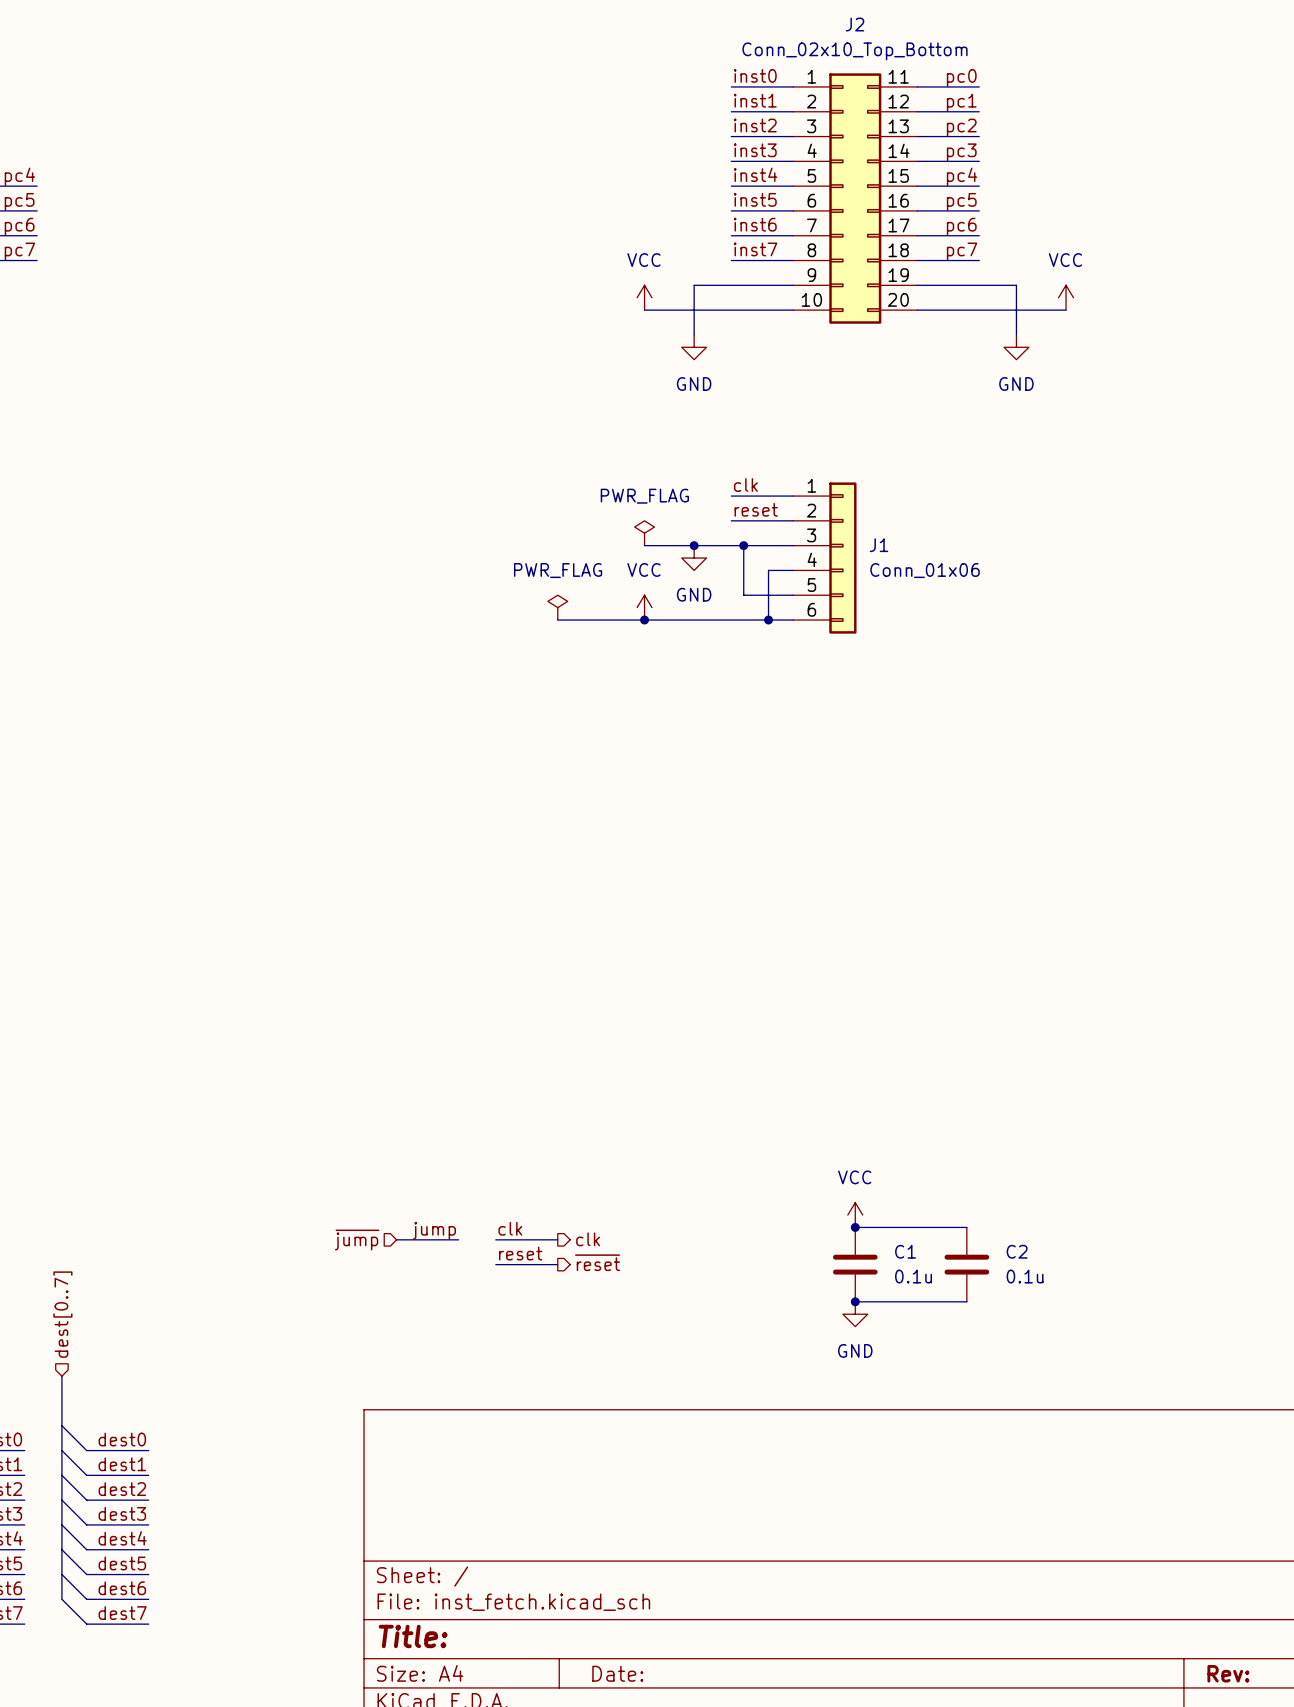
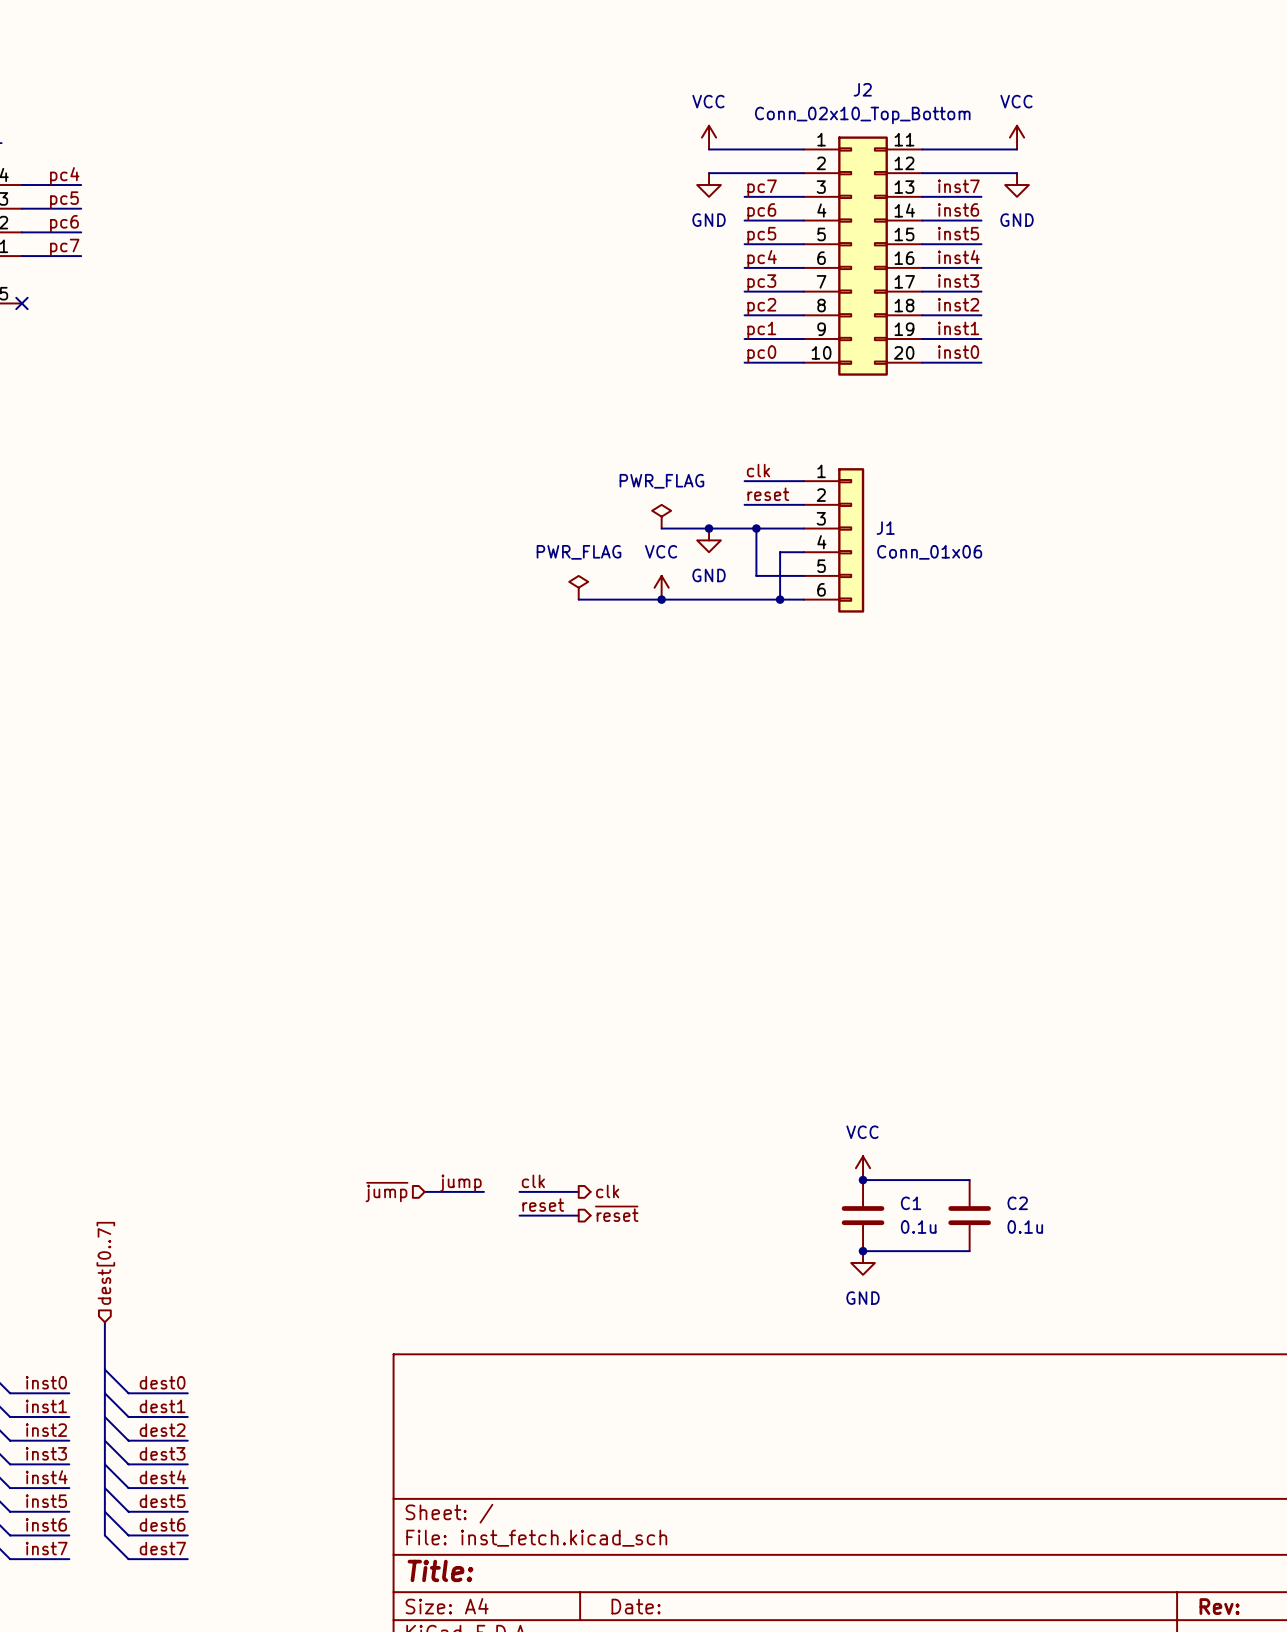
label: inst0 (755, 75) -> none
label: pc0 (961, 77) -> none
wire: (731, 86) (793, 86) -> (744, 196) (803, 196)
wire: (917, 86) (979, 86) -> (922, 196) (981, 196)
label: inst1 (755, 100) -> none
label: pc1 (961, 102) -> none
wire: (731, 111) (793, 111) -> (744, 220) (803, 220)
wire: (917, 111) (979, 111) -> (922, 220) (981, 220)
label: inst2 (755, 125) -> none
label: pc2 (961, 127) -> none
wire: (731, 136) (793, 136) -> (744, 244) (803, 244)
wire: (917, 136) (979, 136) -> (922, 244) (981, 244)
wire: none -> (709, 149) (803, 149)
wire: none -> (922, 149) (1017, 149)
label: inst3 (755, 150) -> none
label: pc3 (961, 152) -> none
wire: (731, 161) (793, 161) -> (744, 267) (803, 267)
wire: (917, 161) (979, 161) -> (922, 267) (981, 267)
wire: none -> (709, 173) (803, 173)
wire: none -> (922, 173) (1017, 173)
label: inst4 (755, 174) -> none
label: pc4 (962, 176) -> none
wire: (731, 186) (793, 186) -> (744, 291) (803, 291)
wire: (917, 186) (979, 186) -> (922, 291) (981, 291)
label: none -> inst7 (958, 186)
label: none -> pc7 (762, 188)
J2 position: (855, 198) -> (863, 256)
label: inst5 (755, 199) -> none
label: pc5 (961, 201) -> none
wire: (731, 210) (793, 210) -> (744, 315) (803, 315)
wire: (917, 210) (979, 210) -> (922, 315) (981, 315)
label: none -> inst6 (958, 209)
label: none -> pc6 (761, 211)
label: inst6 (755, 224) -> none
label: pc6 (961, 226) -> none
wire: (731, 235) (793, 235) -> (744, 339) (803, 339)
wire: (917, 235) (979, 235) -> (922, 339) (981, 339)
label: none -> inst5 (958, 233)
label: none -> pc5 (761, 235)
label: inst7 (755, 249) -> none
label: pc7 (962, 251) -> none
wire: (731, 260) (793, 260) -> (744, 362) (803, 362)
wire: (917, 260) (979, 260) -> (922, 362) (981, 362)
label: none -> inst4 (958, 257)
label: none -> pc4 (762, 259)
wire: (793, 285) (694, 285) (694, 334) -> none
wire: (917, 285) (1016, 285) (1016, 334) -> none
label: none -> inst3 (958, 281)
label: none -> pc3 (761, 283)
power symbol position: VCC (644, 297) -> VCC (709, 137)
power symbol position: VCC (1066, 297) -> VCC (1017, 137)
wire: (644, 310) (793, 310) -> none
wire: (917, 310) (1066, 310) -> none
label: none -> inst2 (958, 304)
label: none -> pc2 (761, 306)
label: none -> inst1 (958, 328)
label: none -> pc1 (761, 330)
power symbol position: GND (694, 347) -> GND (709, 185)
power symbol position: GND (1016, 347) -> GND (1017, 185)
label: none -> inst0 (958, 352)
label: none -> pc0 (761, 354)

